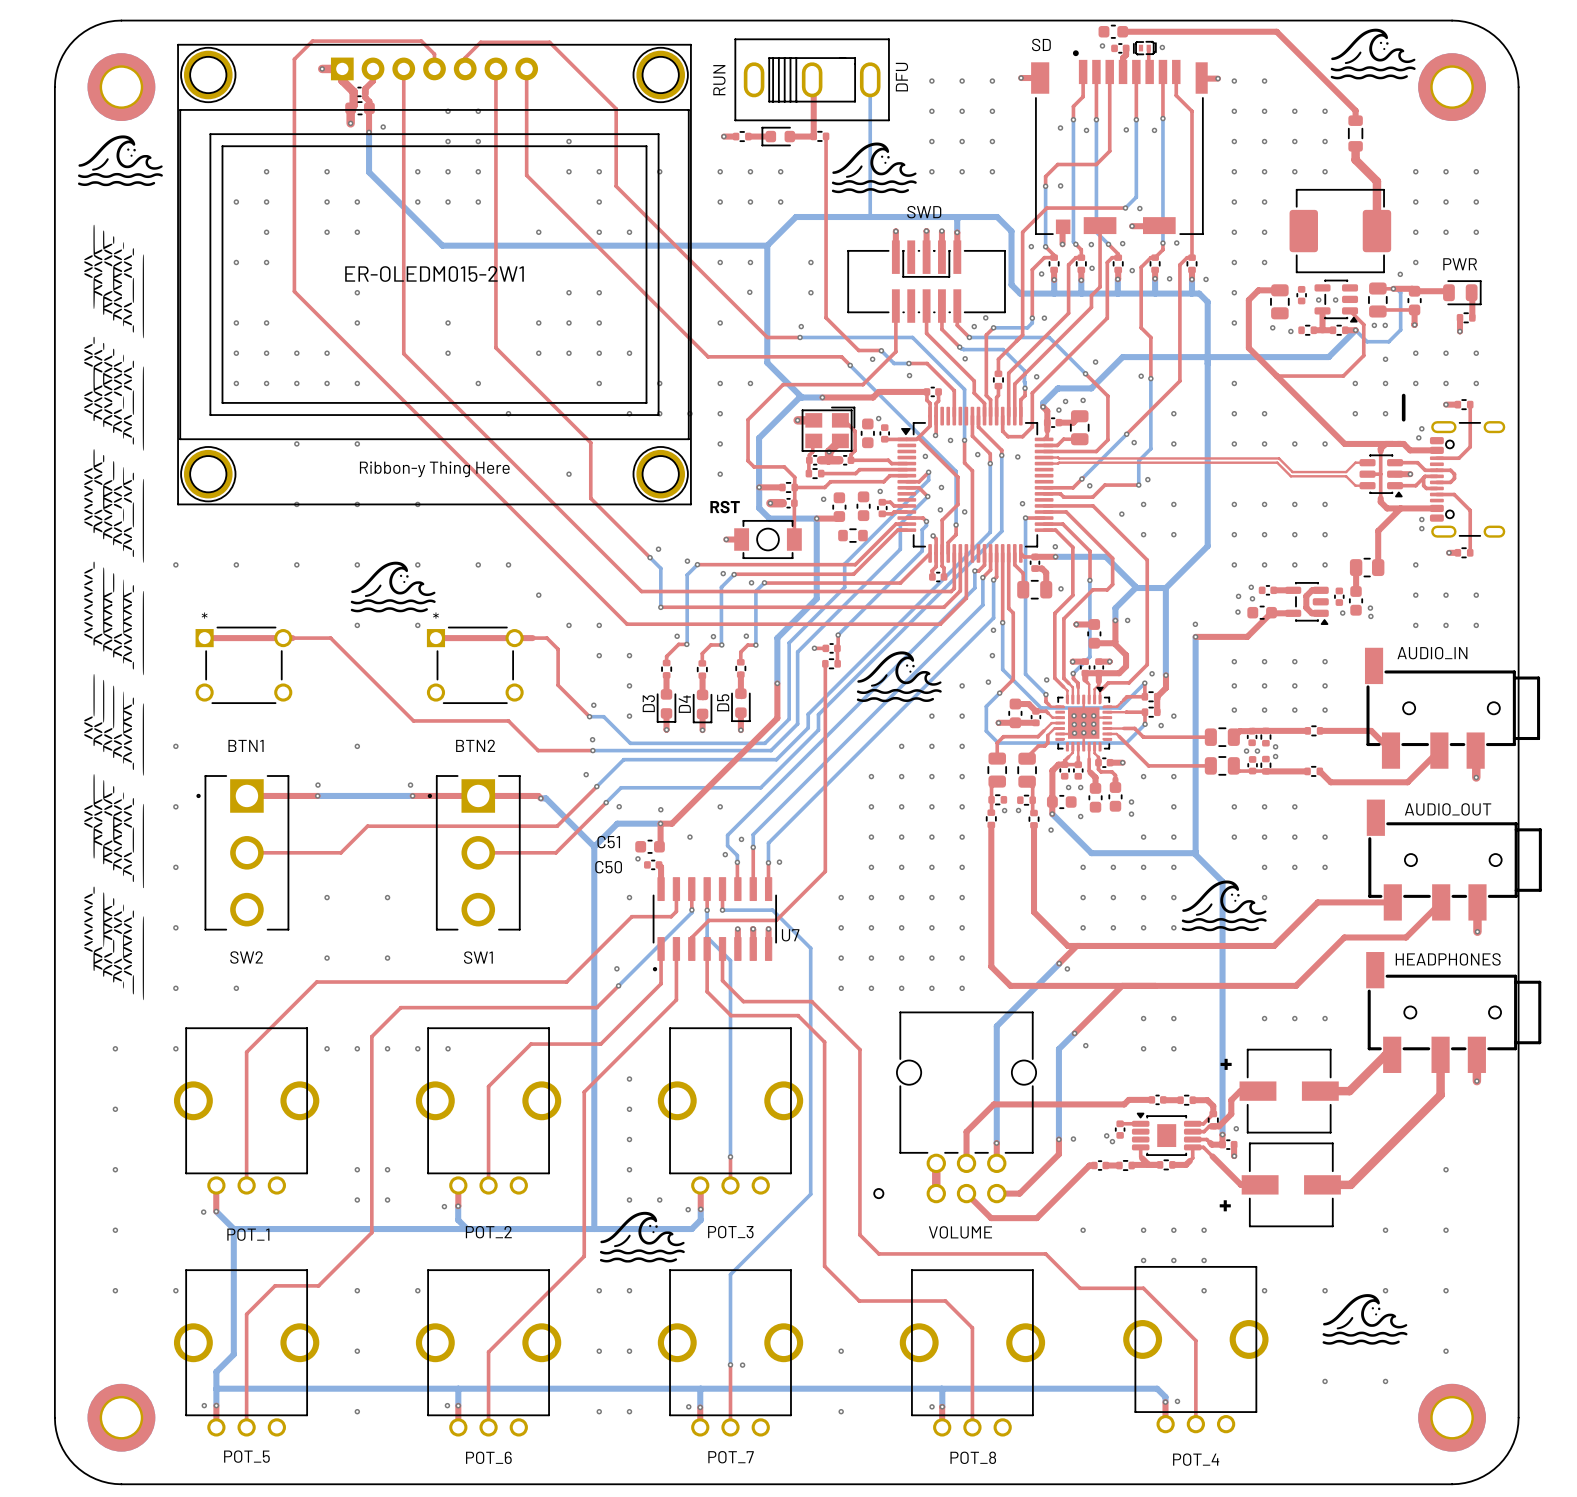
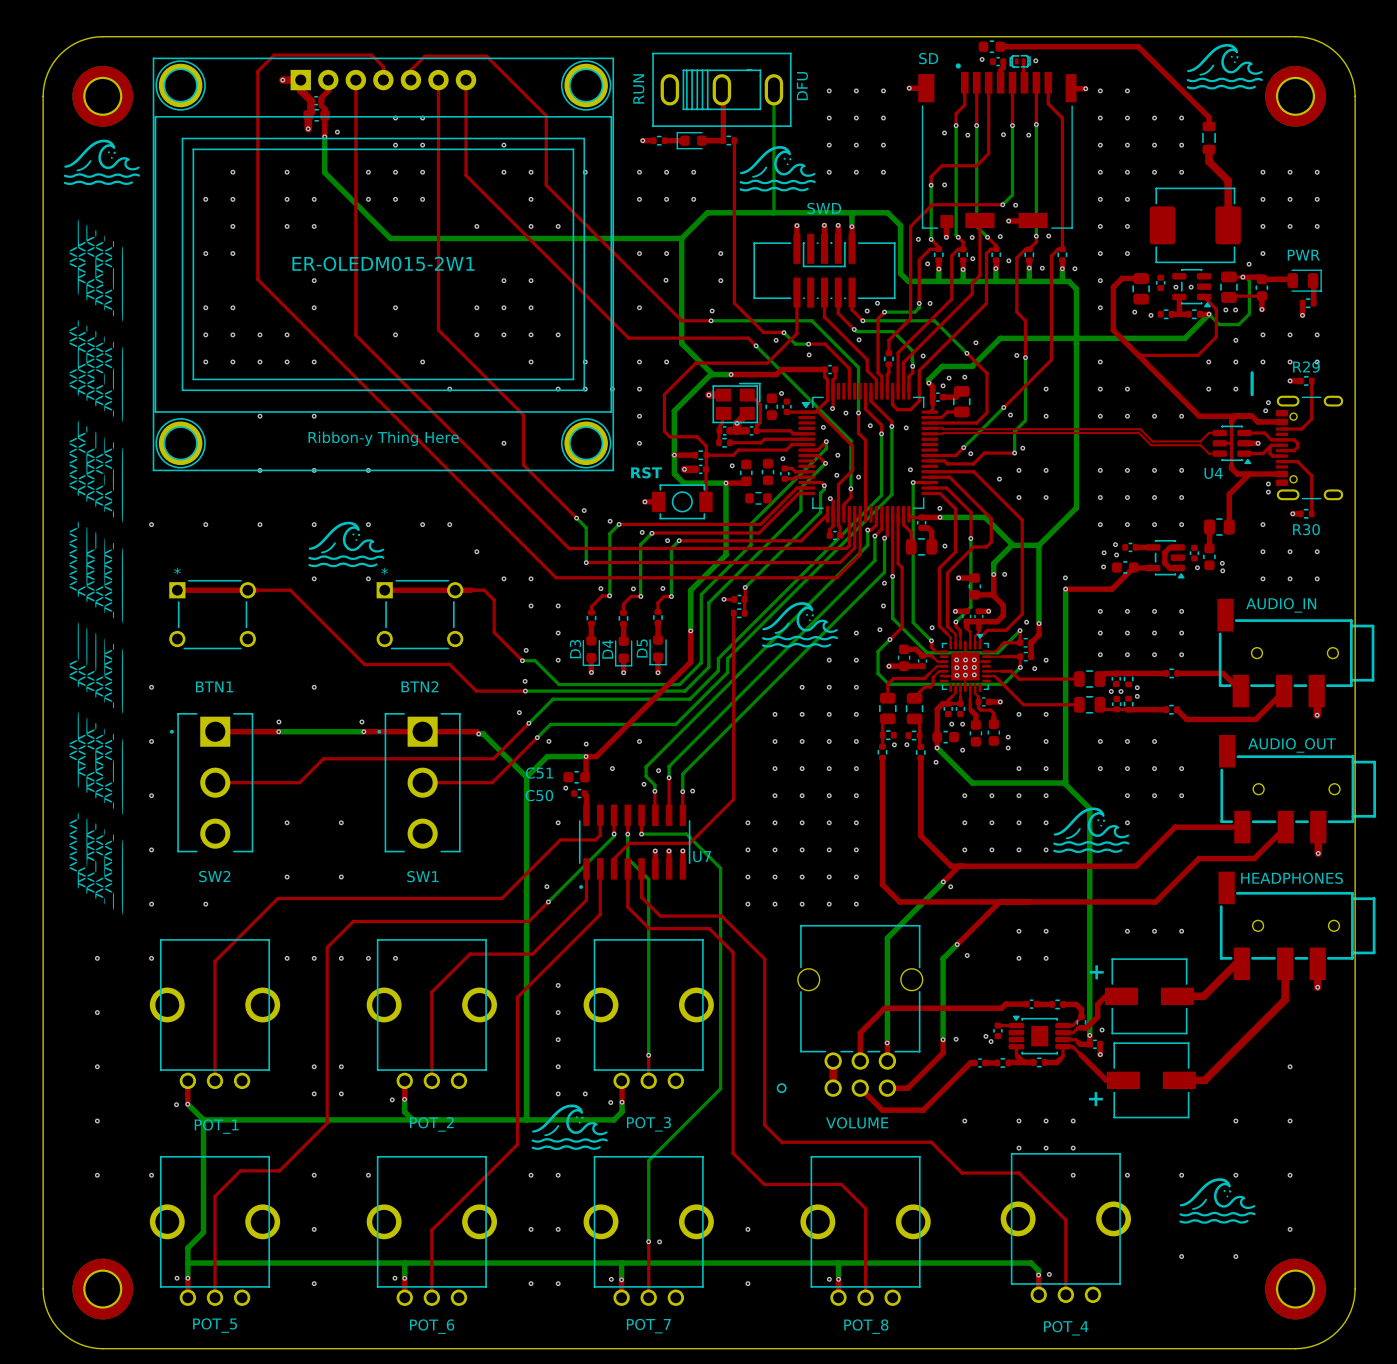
R29 name: none -> R29 (1306, 367)
U4 name: none -> U4 (1213, 473)
R30 name: none -> R30 (1306, 529)

